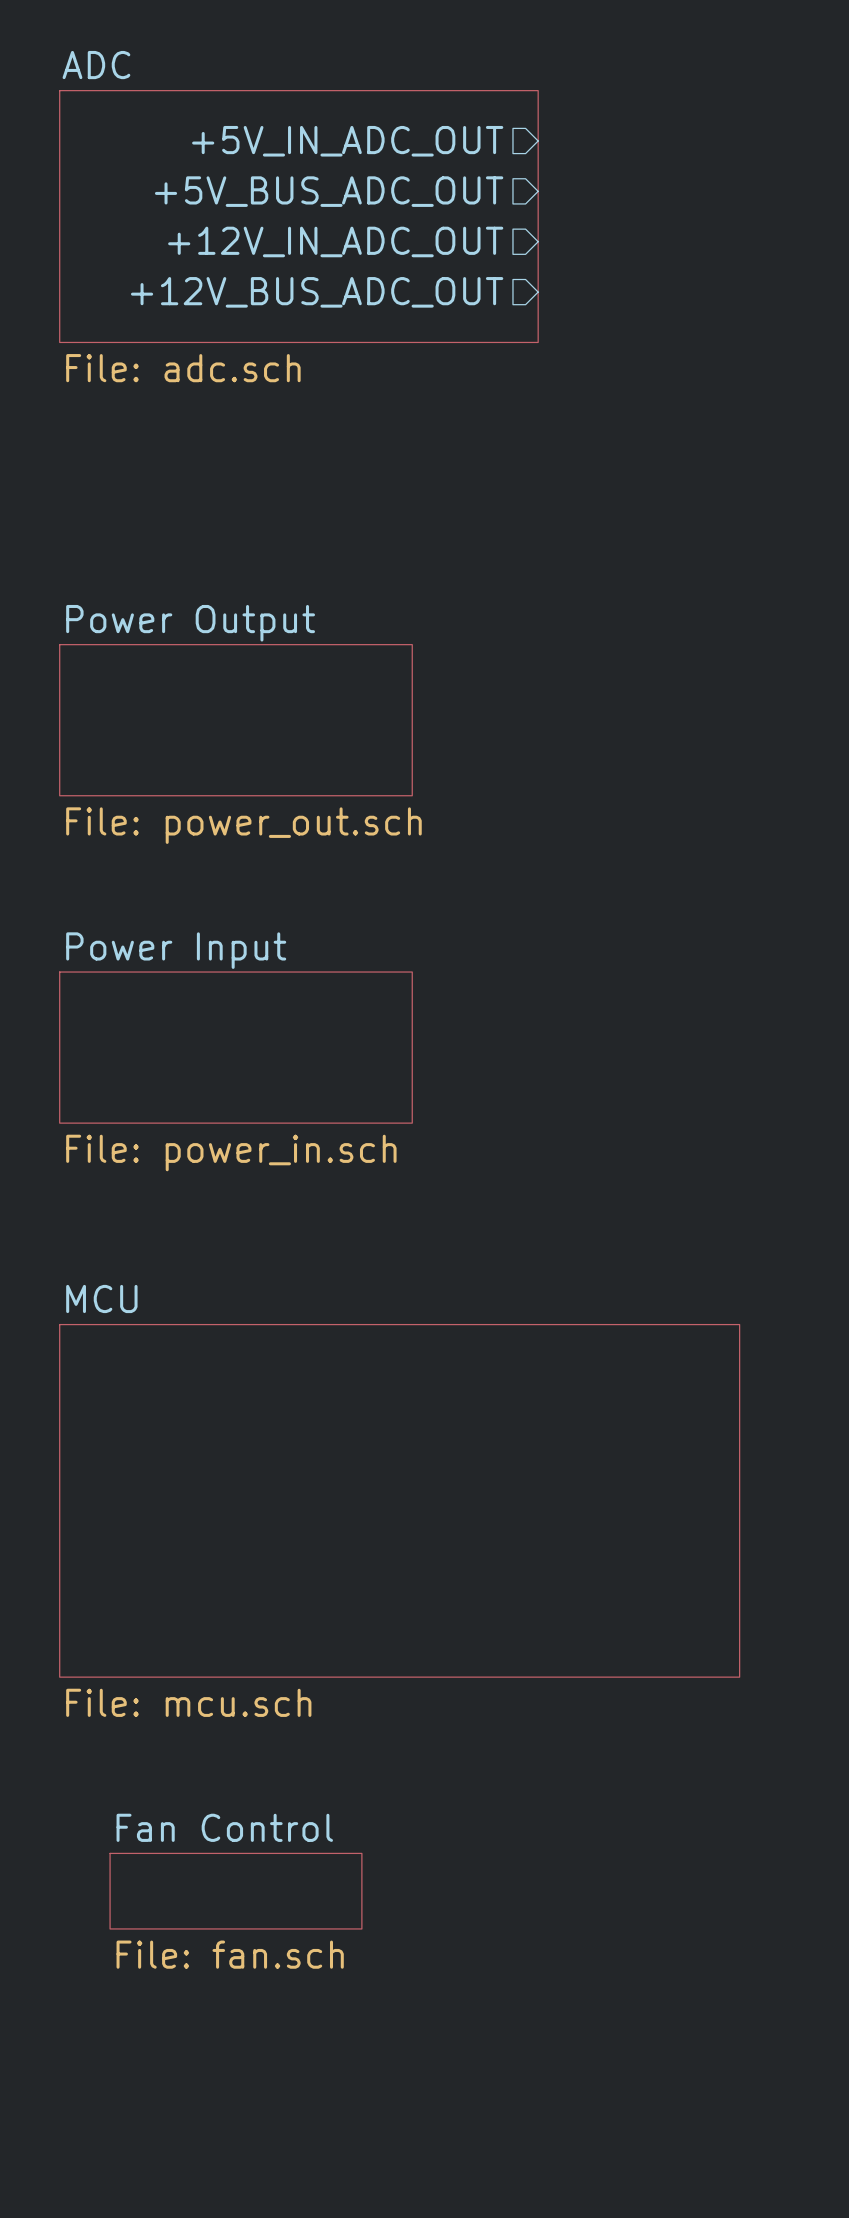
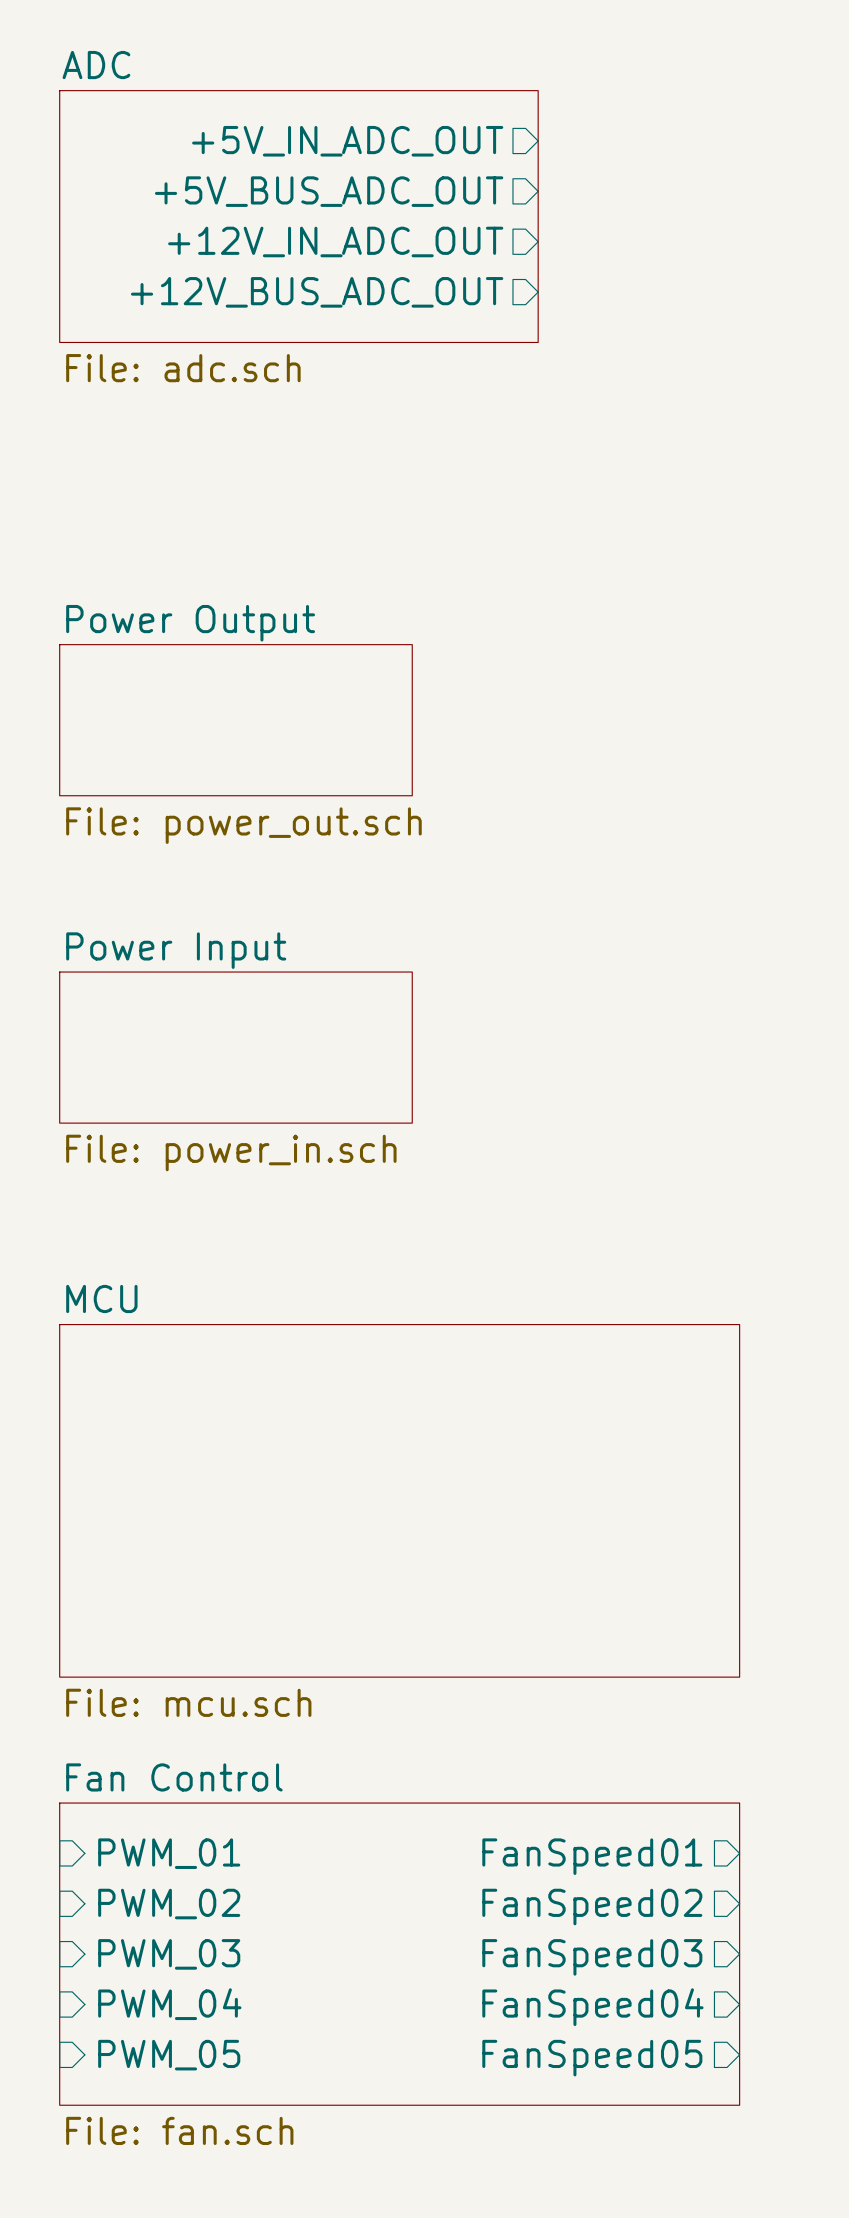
sheet pin: none -> PWM_01 (169, 1853)
sheet pin: none -> FanSpeed01 (592, 1856)
sheet Fan Control: File: fan.sch (235, 1891) -> none
sheet pin: none -> PWM_02 (169, 1904)
sheet pin: none -> FanSpeed02 (592, 1907)
sheet pin: none -> PWM_03 (169, 1954)
sheet Fan Control: none -> File: fan.sch (399, 1954)
sheet pin: none -> FanSpeed03 (592, 1957)
sheet pin: none -> PWM_04 (169, 2004)
sheet pin: none -> FanSpeed04 (592, 2007)
sheet pin: none -> PWM_05 (169, 2055)
sheet pin: none -> FanSpeed05 (592, 2058)

